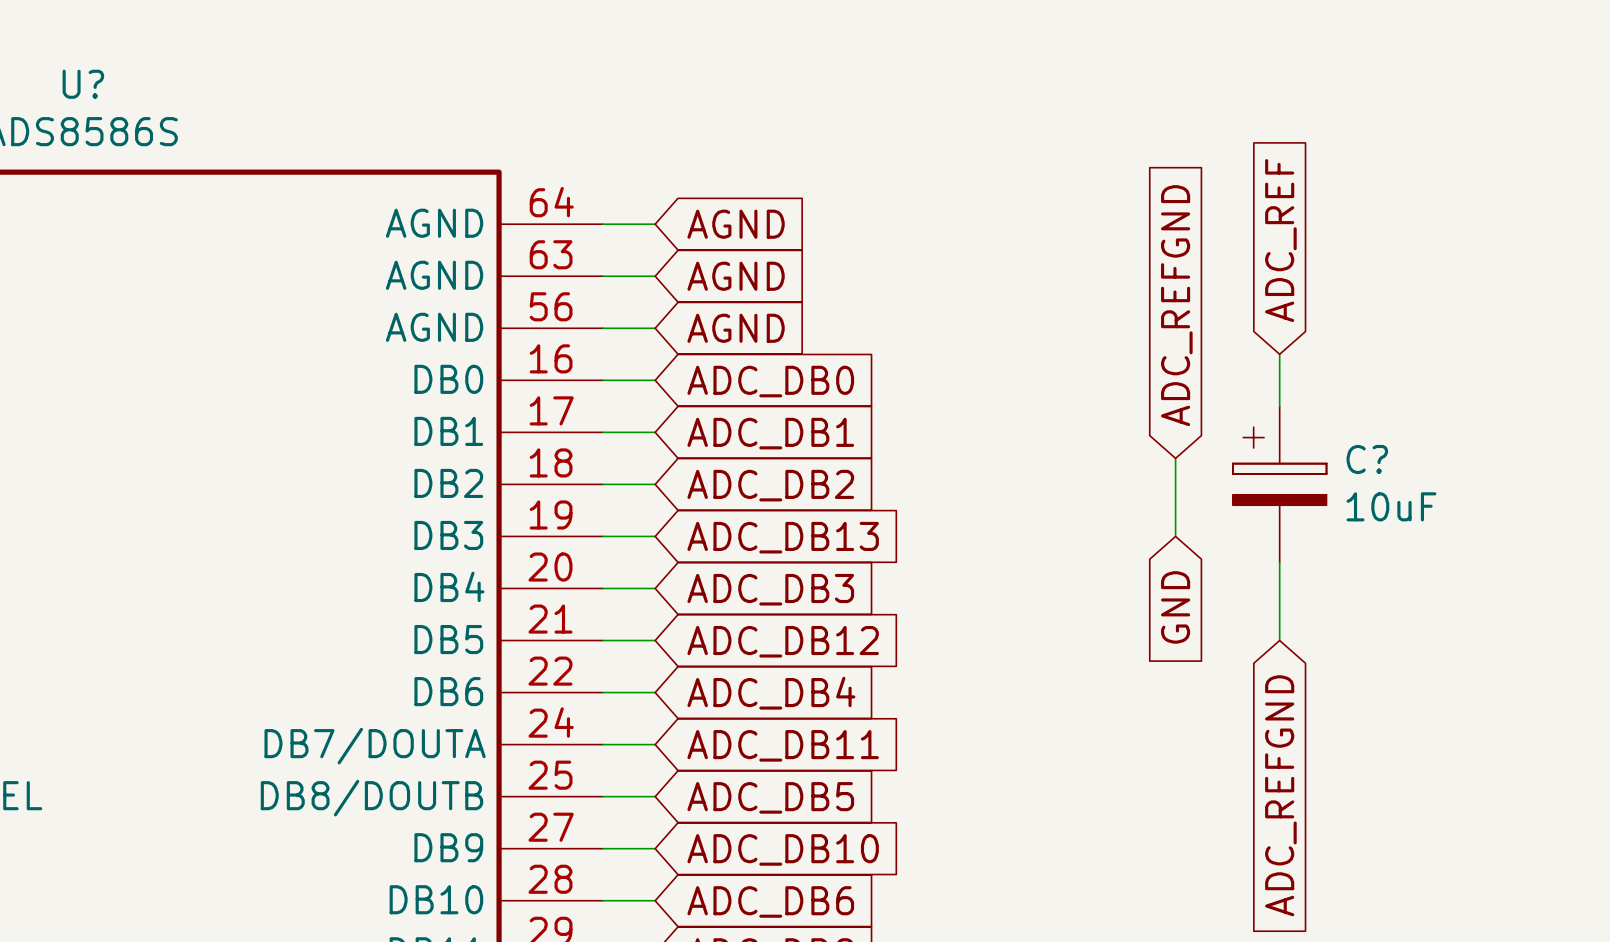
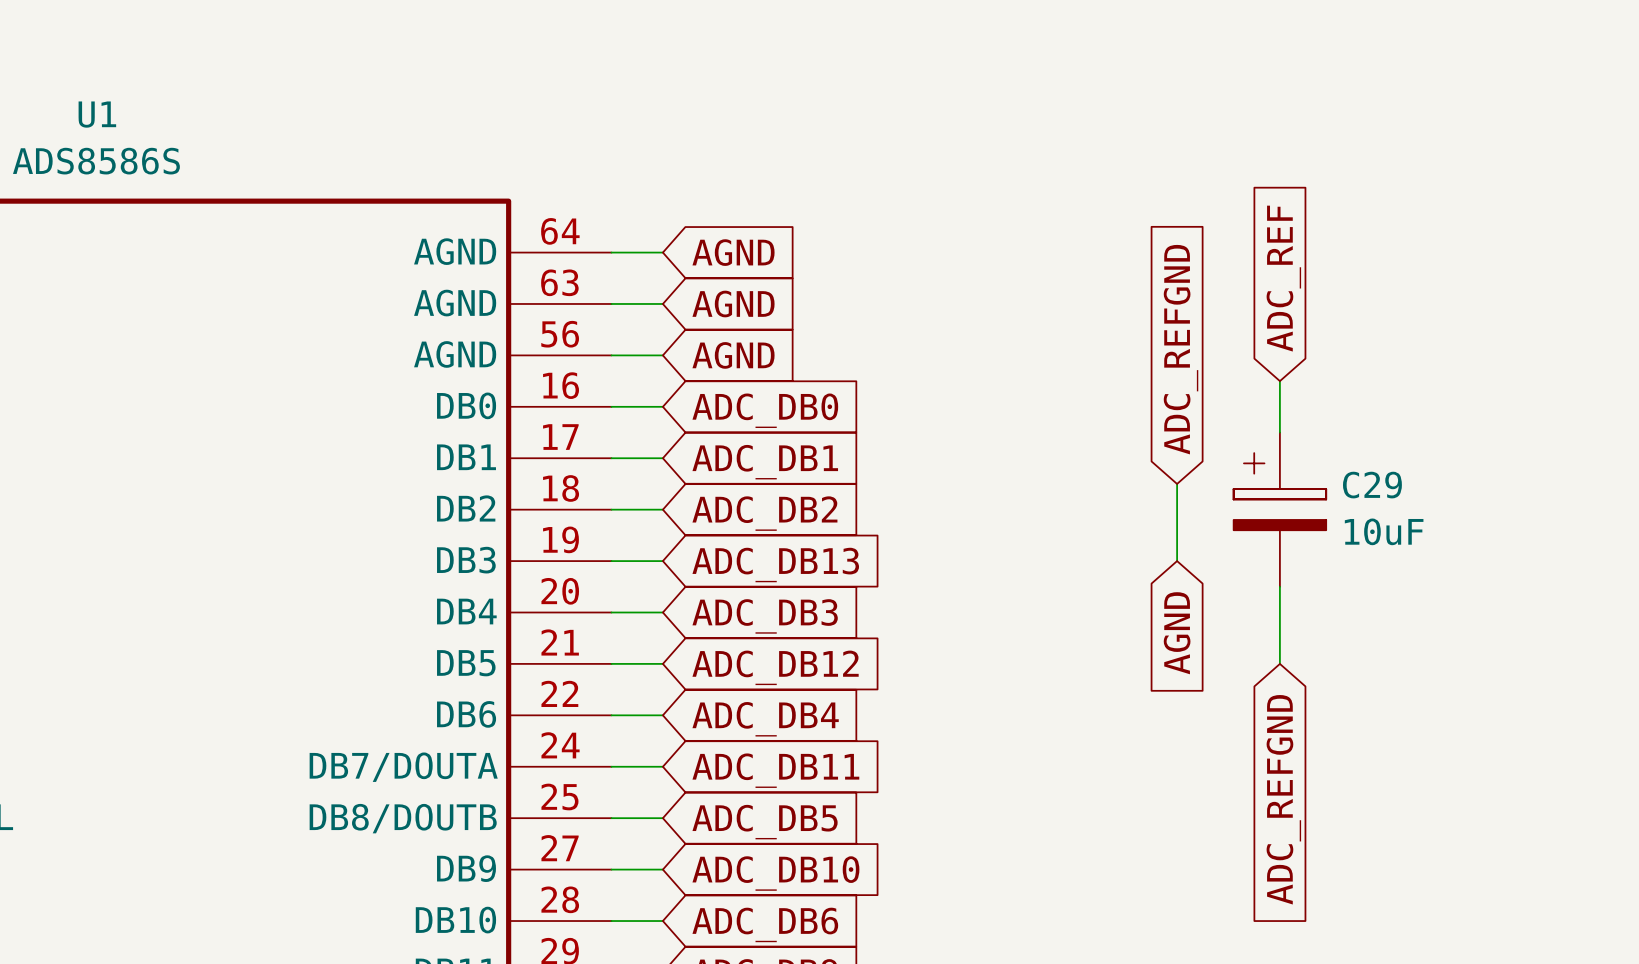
U? name: U? (83, 84) -> U1 (97, 114)
C? name: C? (1367, 459) -> C29 (1372, 485)
global label: GND (1175, 607) -> AGND (1177, 633)

